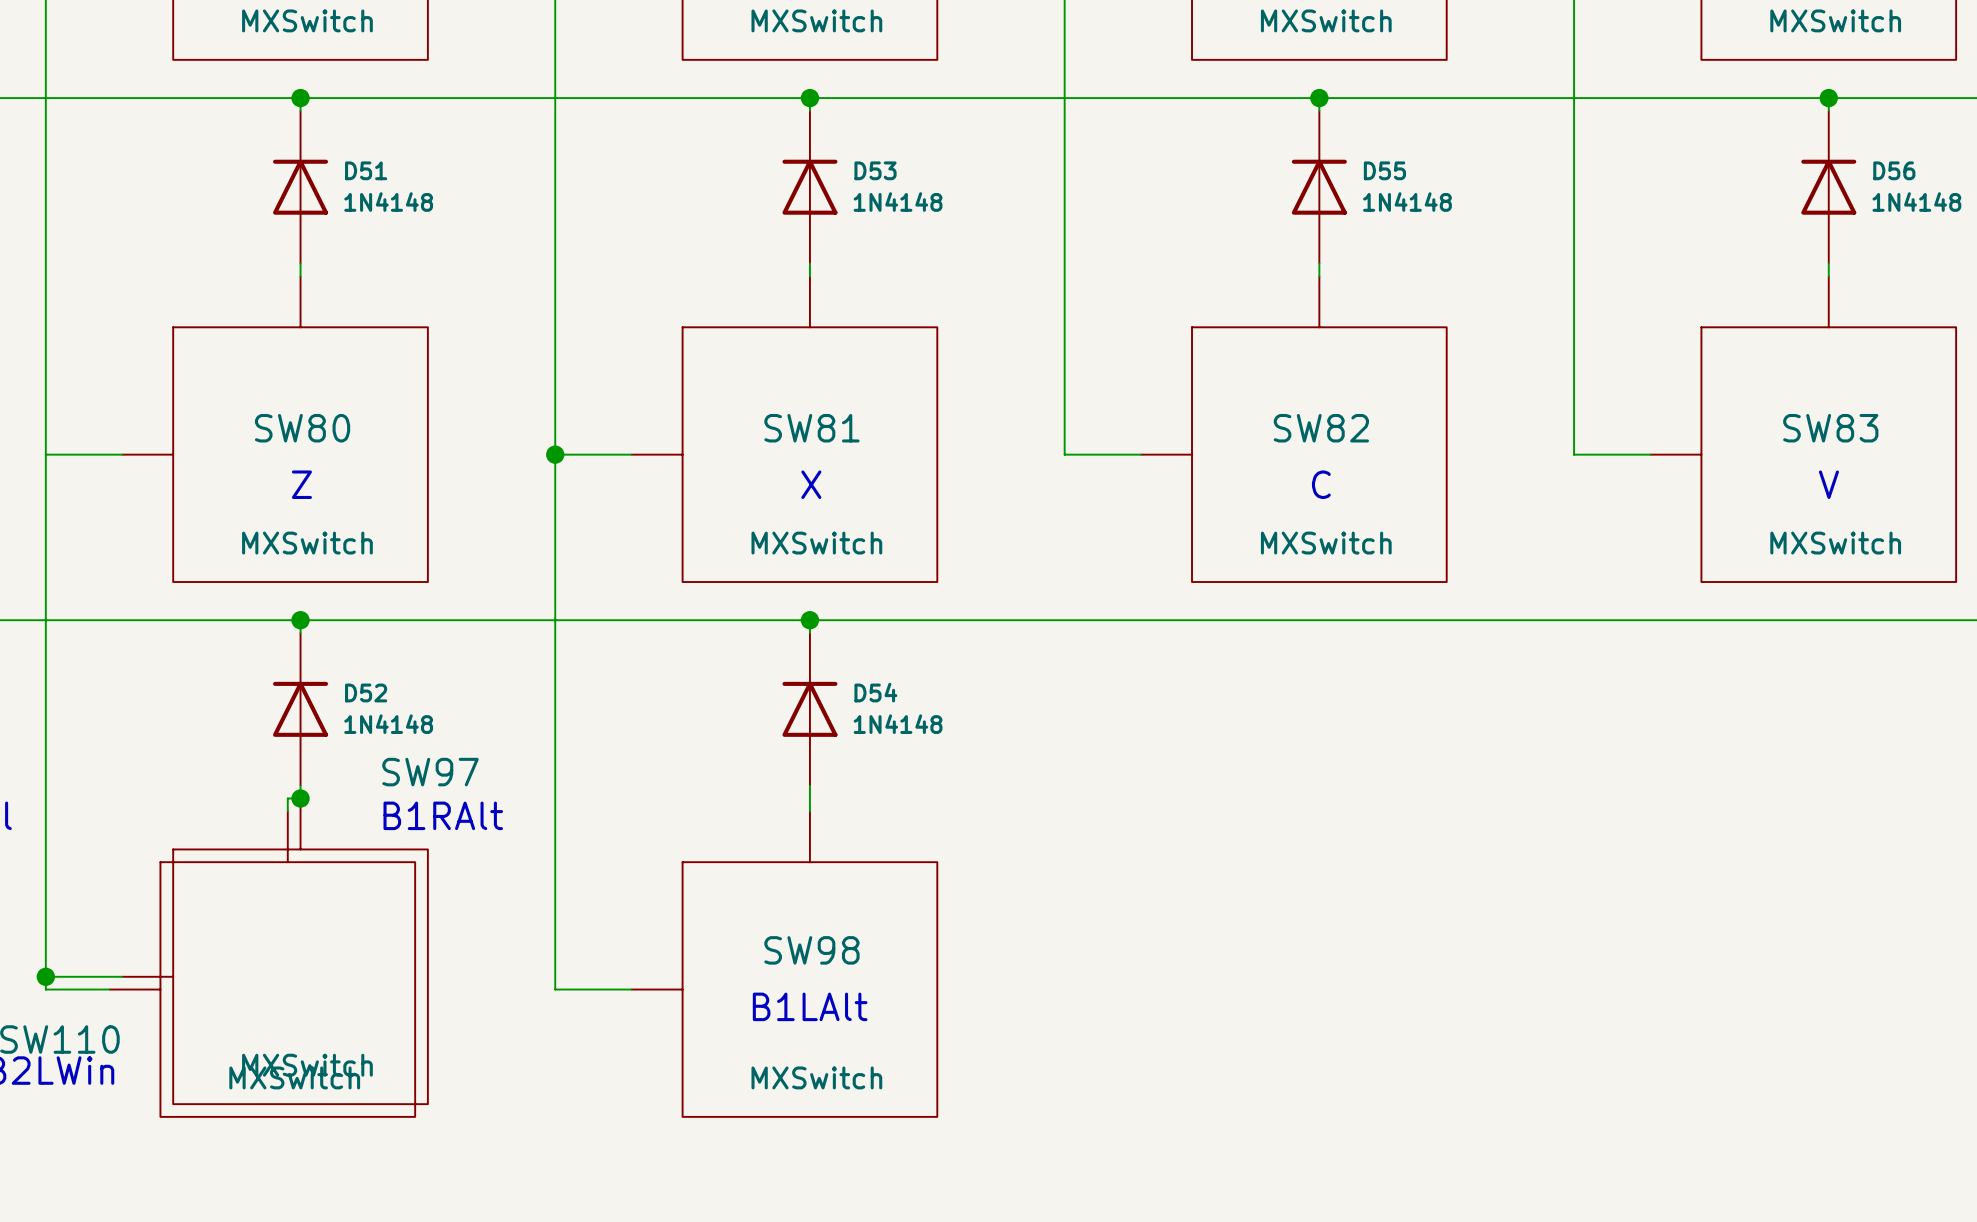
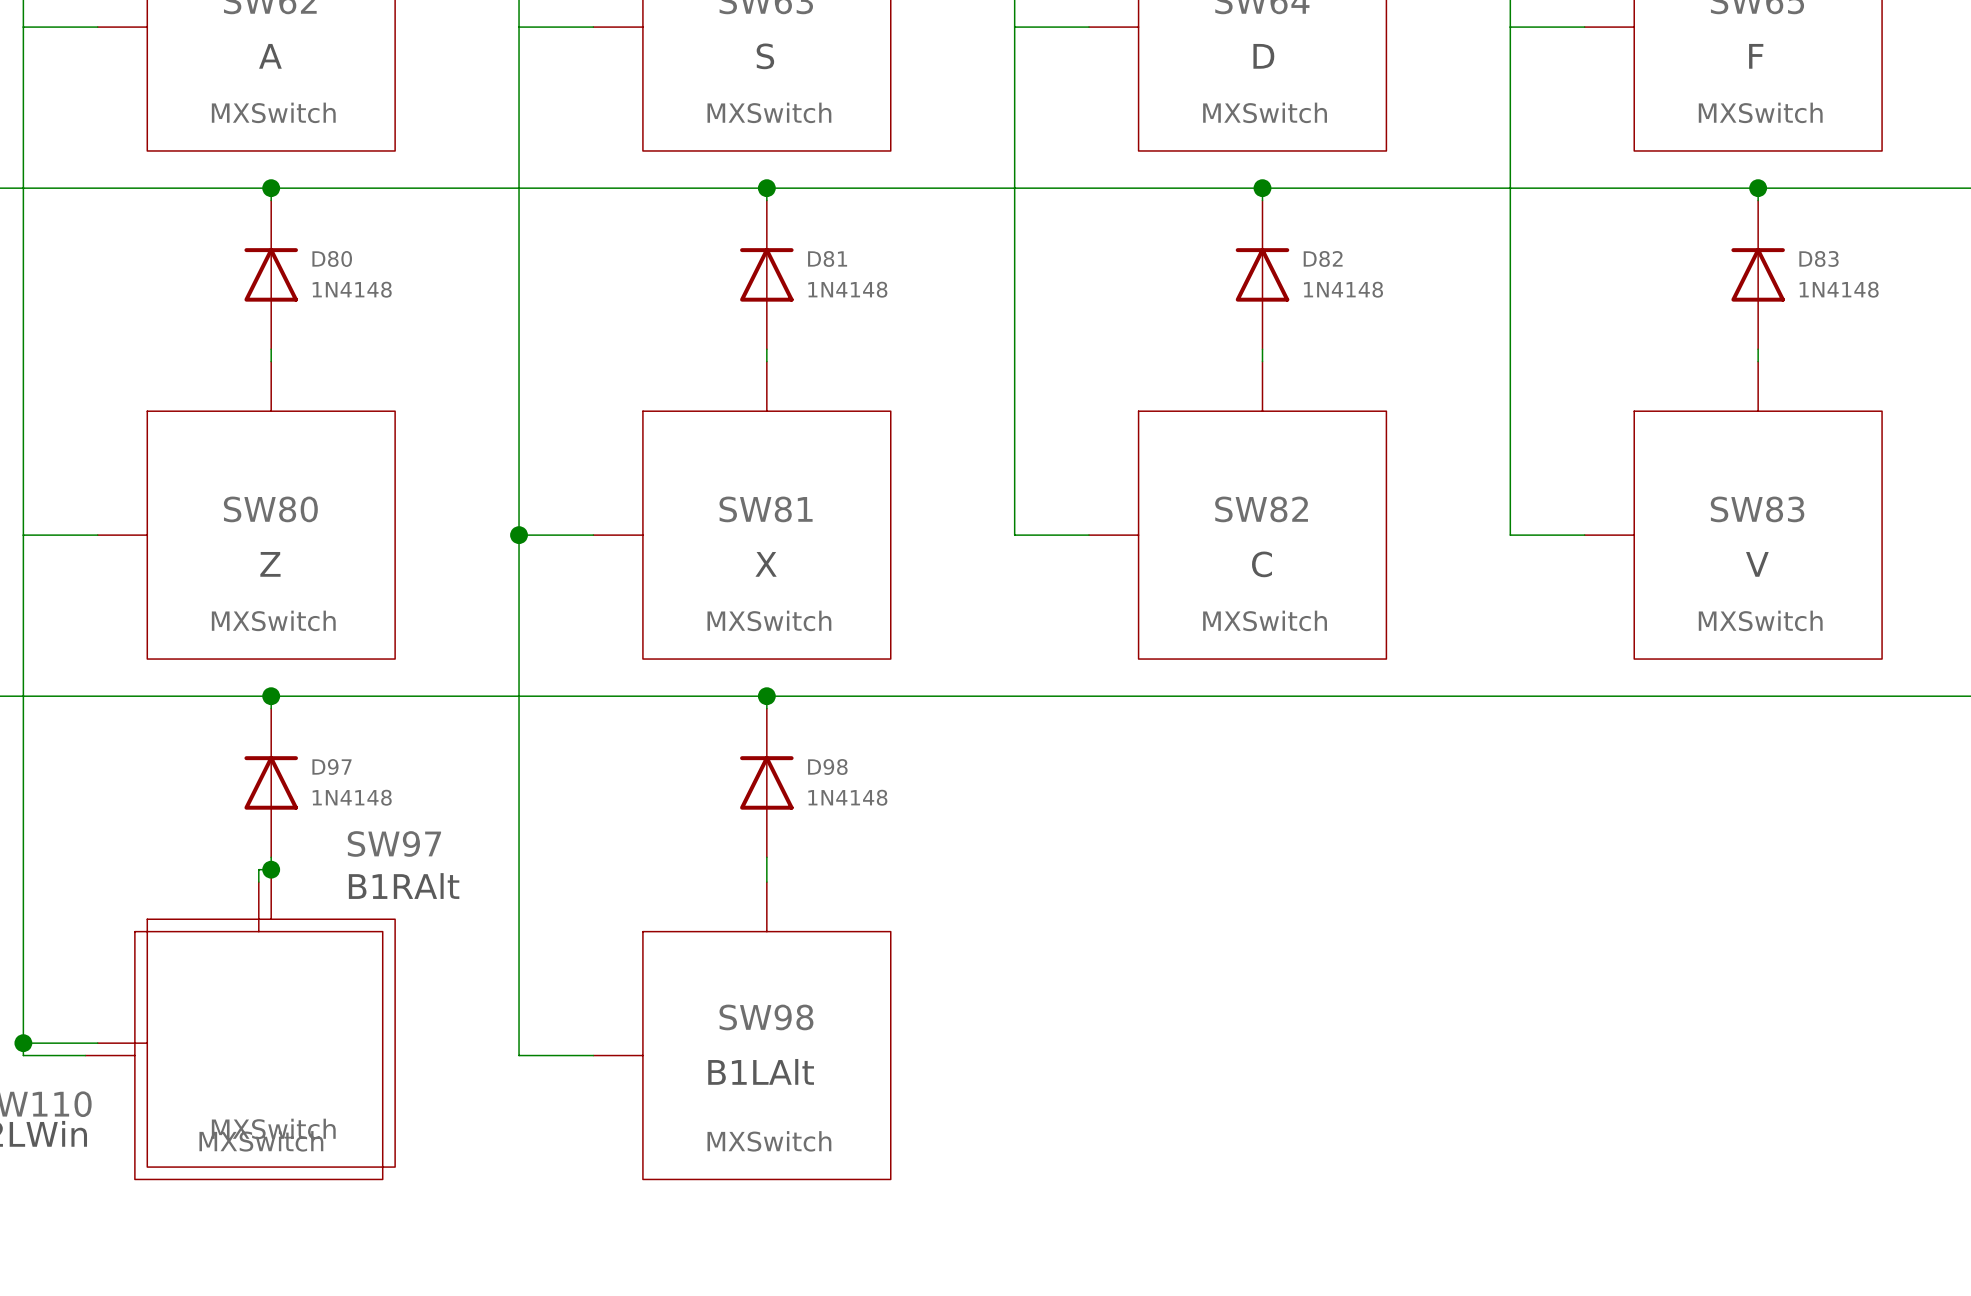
D51 name: D51 (366, 170) -> D80 (332, 258)
D53 name: D53 (875, 170) -> D81 (827, 258)
D55 name: D55 (1384, 170) -> D82 (1323, 258)
D56 name: D56 (1894, 170) -> D83 (1819, 258)
D52 name: D52 (366, 692) -> D97 (332, 767)
D54 name: D54 (875, 692) -> D98 (827, 767)

